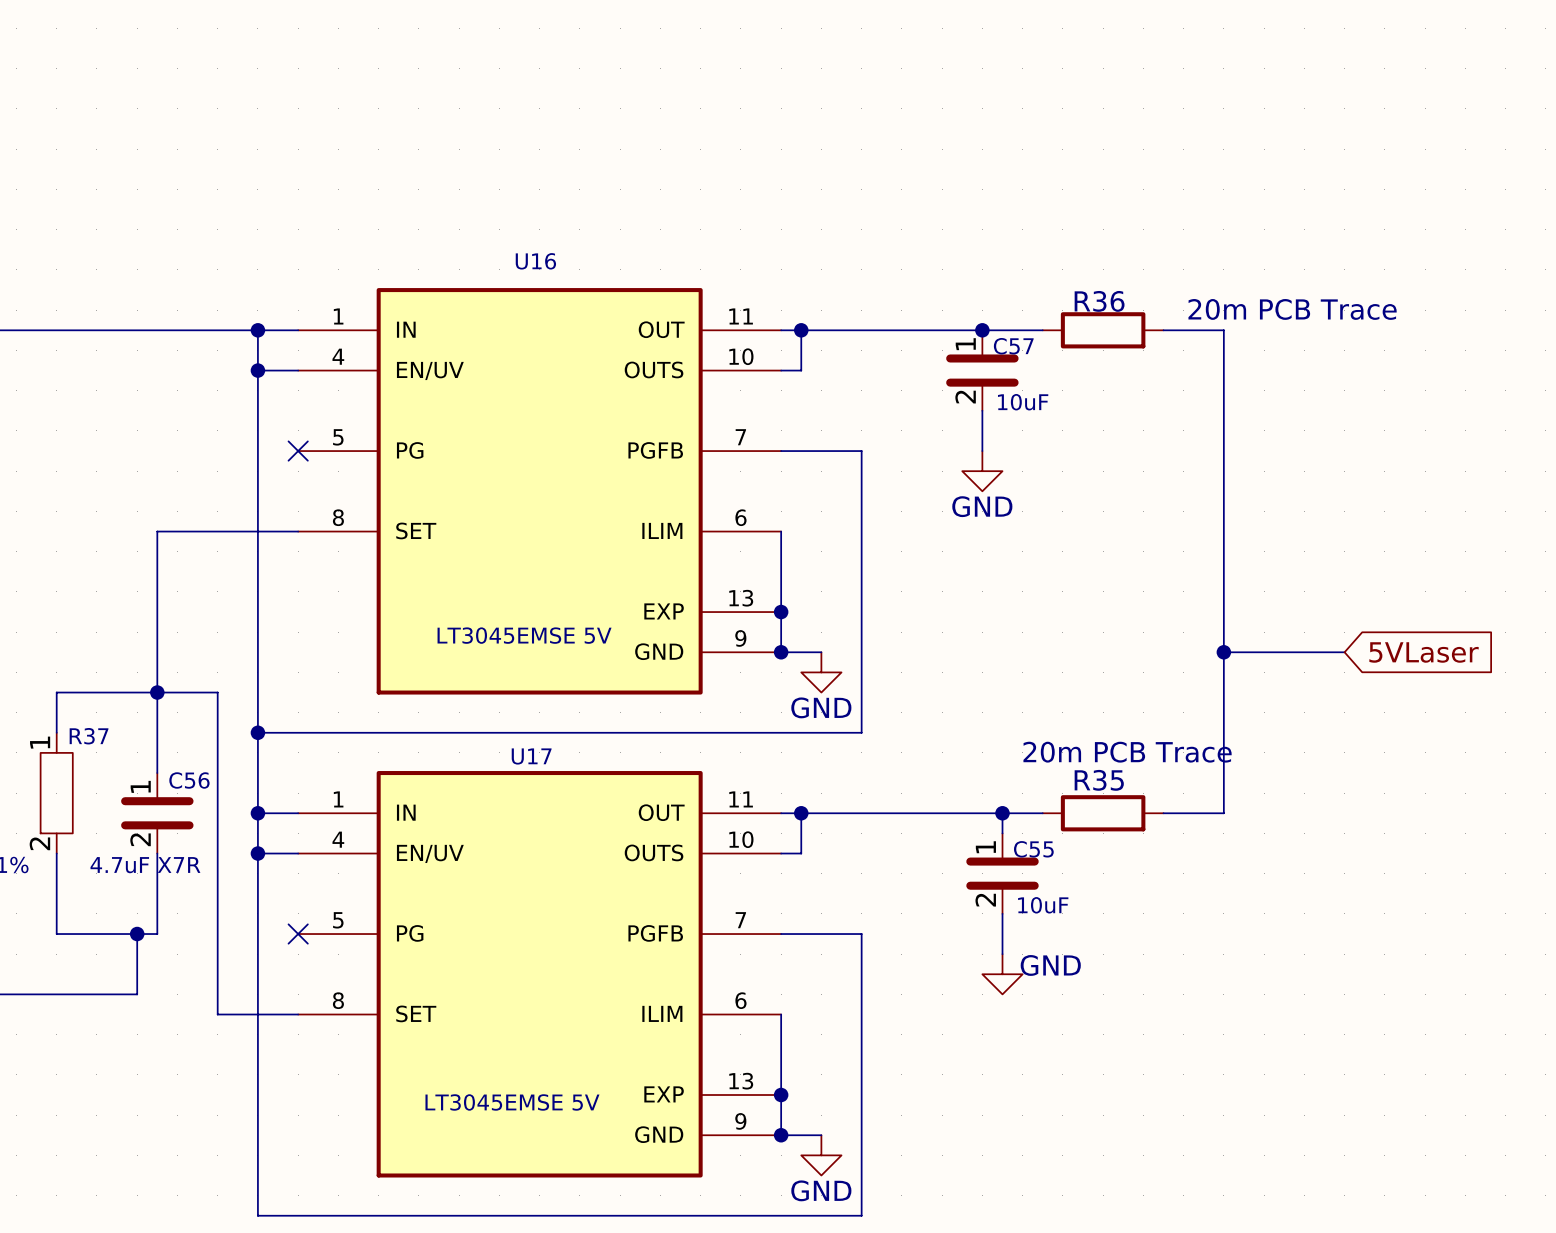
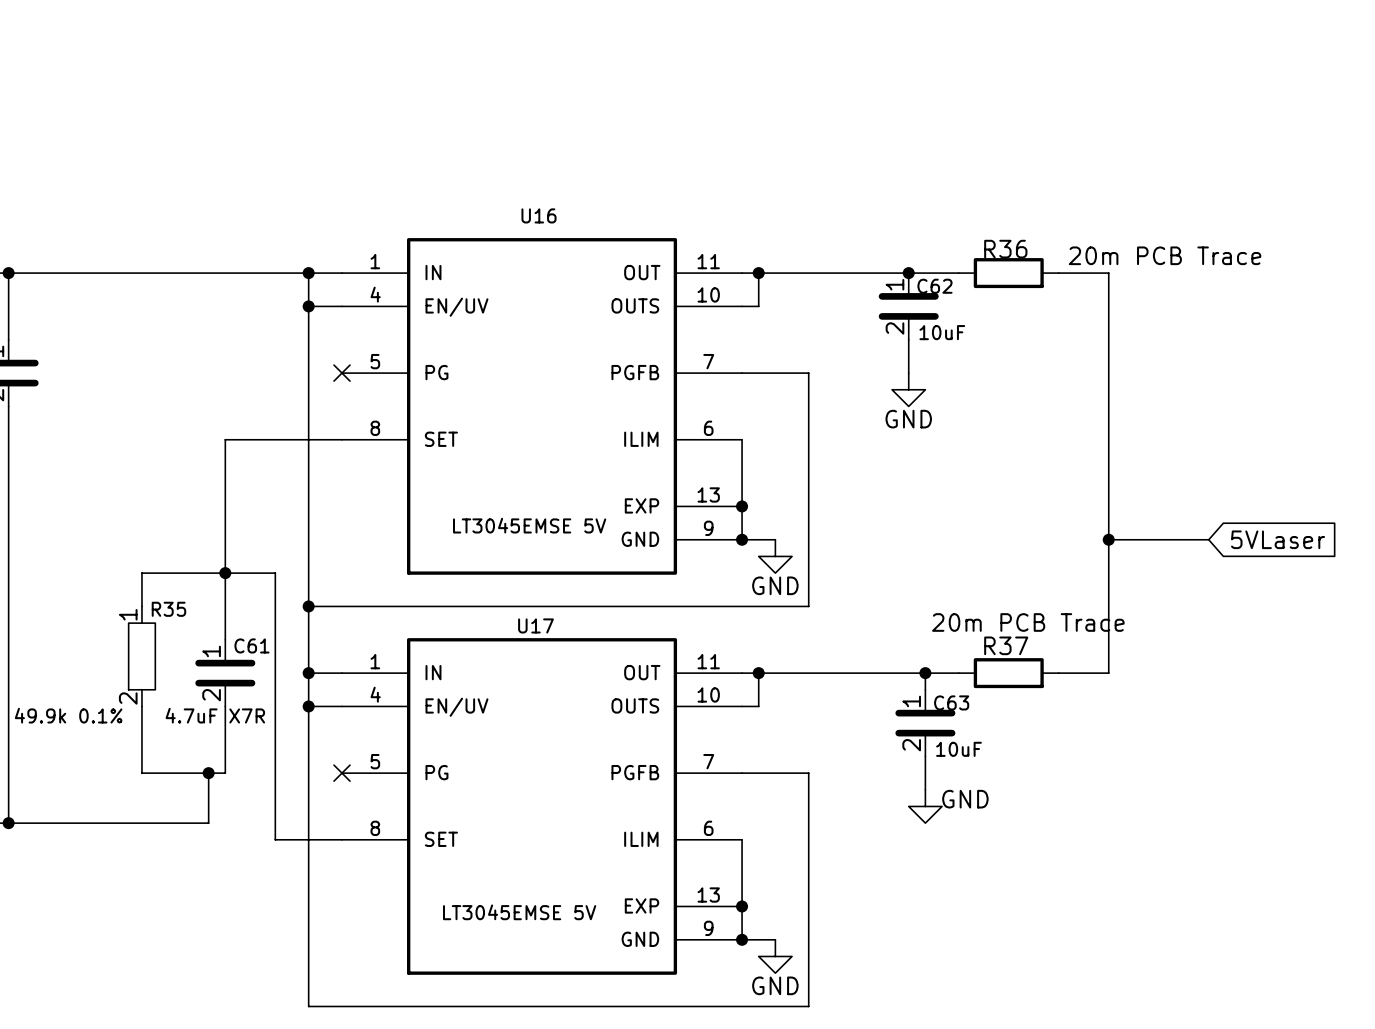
C57 name: C57 (1013, 346) -> C62 (934, 286)
R37 name: R37 (89, 736) -> R35 (168, 609)
C56 name: C56 (189, 780) -> C61 (251, 645)
R35 name: R35 (1099, 780) -> R37 (1006, 645)
C55 name: C55 (1033, 849) -> C63 (951, 702)

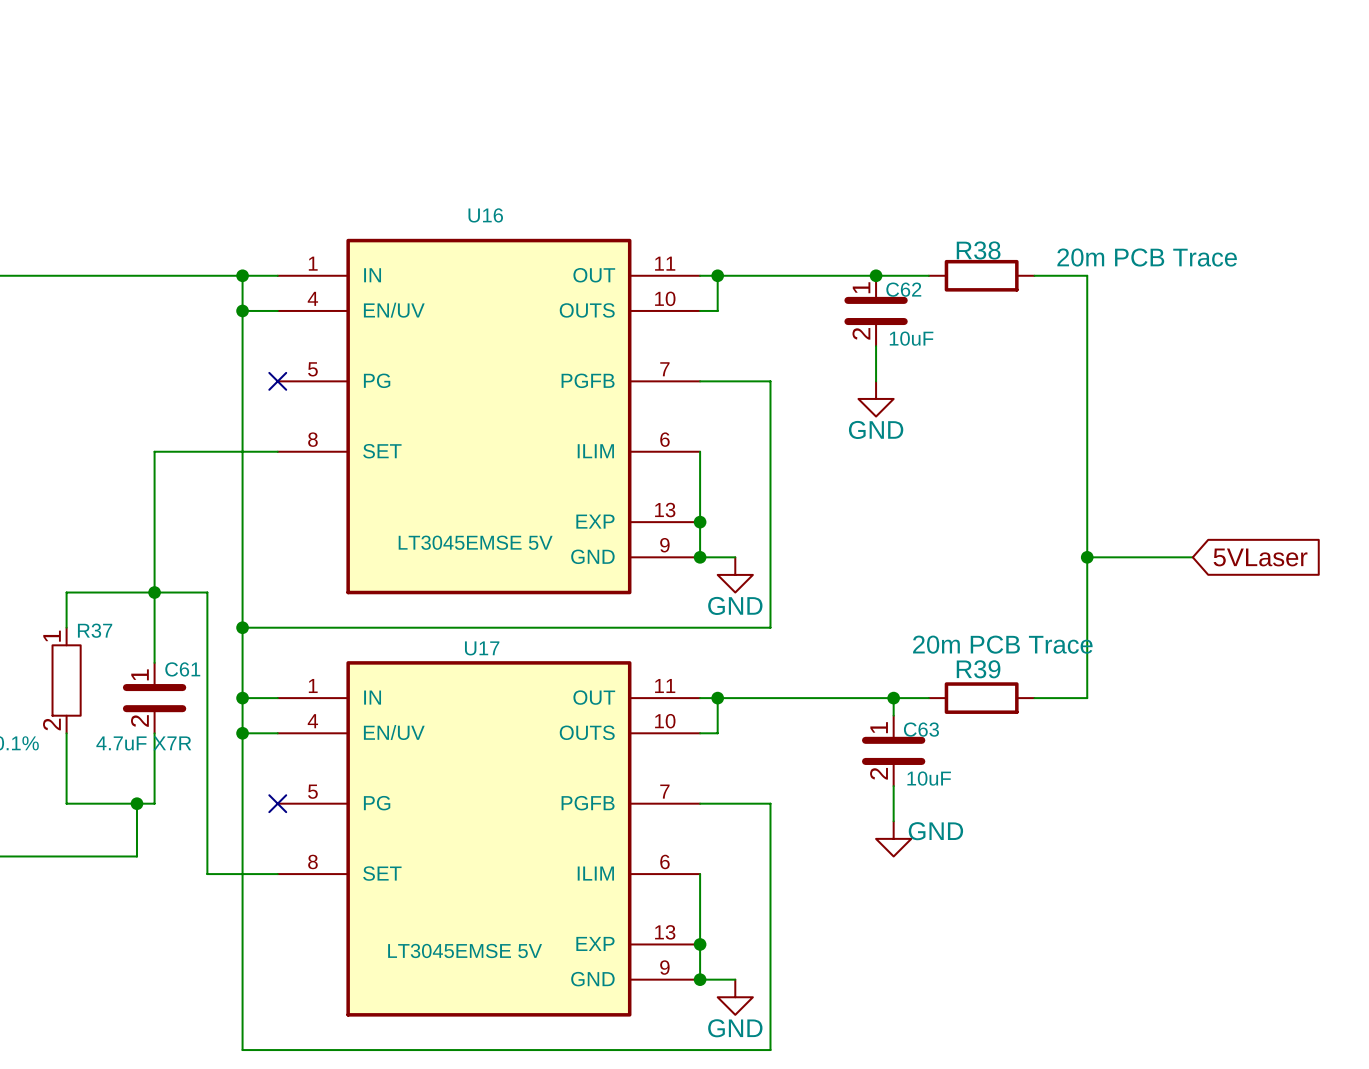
R36 name: R36 (1005, 249) -> R38 (978, 250)
R35 name: R35 (168, 609) -> R37 (95, 630)
R37 name: R37 (1006, 645) -> R39 (978, 669)

